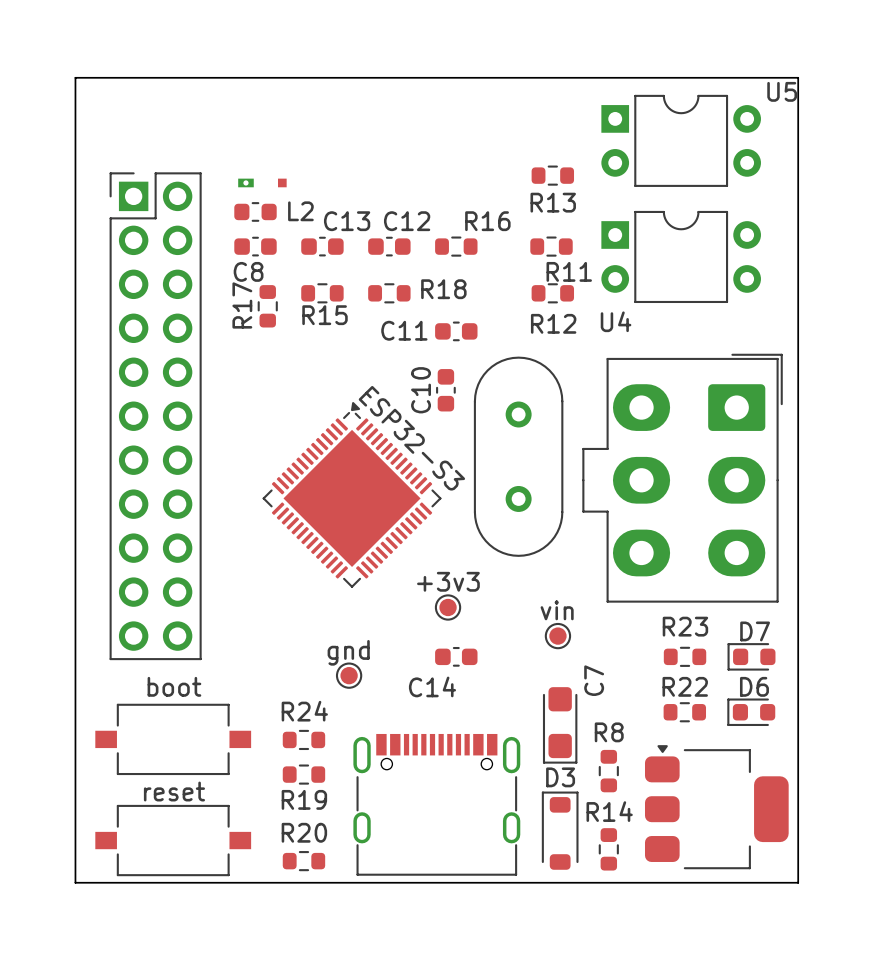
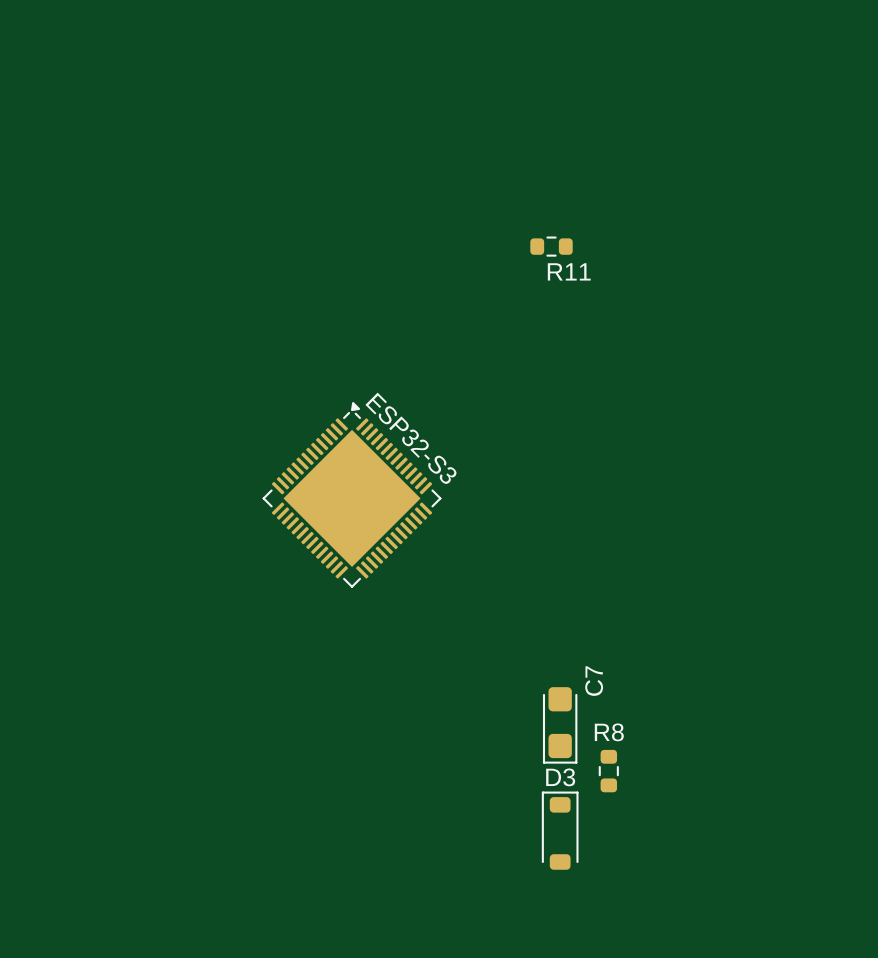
board edge: (75, 77) (798, 77) (798, 882) (75, 882) (75, 77) -> none
U5: (681, 140) -> none
R13: (552, 175) -> none
part: (262, 182) -> none
L2: (255, 211) -> none
C8: (255, 246) -> none
C13: (322, 246) -> none
C12: (389, 246) -> none
R16: (456, 246) -> none
U4: (681, 256) -> none
R15: (322, 293) -> none
R18: (389, 293) -> none
R12: (552, 293) -> none
R17: (267, 306) -> none
C11: (456, 331) -> none
C10: (445, 390) -> none
part: (155, 416) -> none
part: (518, 456) -> none
part: (682, 478) -> none
+3v3: (448, 607) -> none
vin: (557, 636) -> none
C14: (456, 656) -> none
R23: (685, 656) -> none
D7: (751, 656) -> none
gnd: (349, 675) -> none
R22: (684, 712) -> none
D6: (751, 712) -> none
boot: (173, 739) -> none
R24: (303, 739) -> none
R19: (303, 774) -> none
part: (436, 804) -> none
part: (716, 807) -> none
reset: (173, 840) -> none
R14: (608, 849) -> none
R20: (303, 861) -> none

